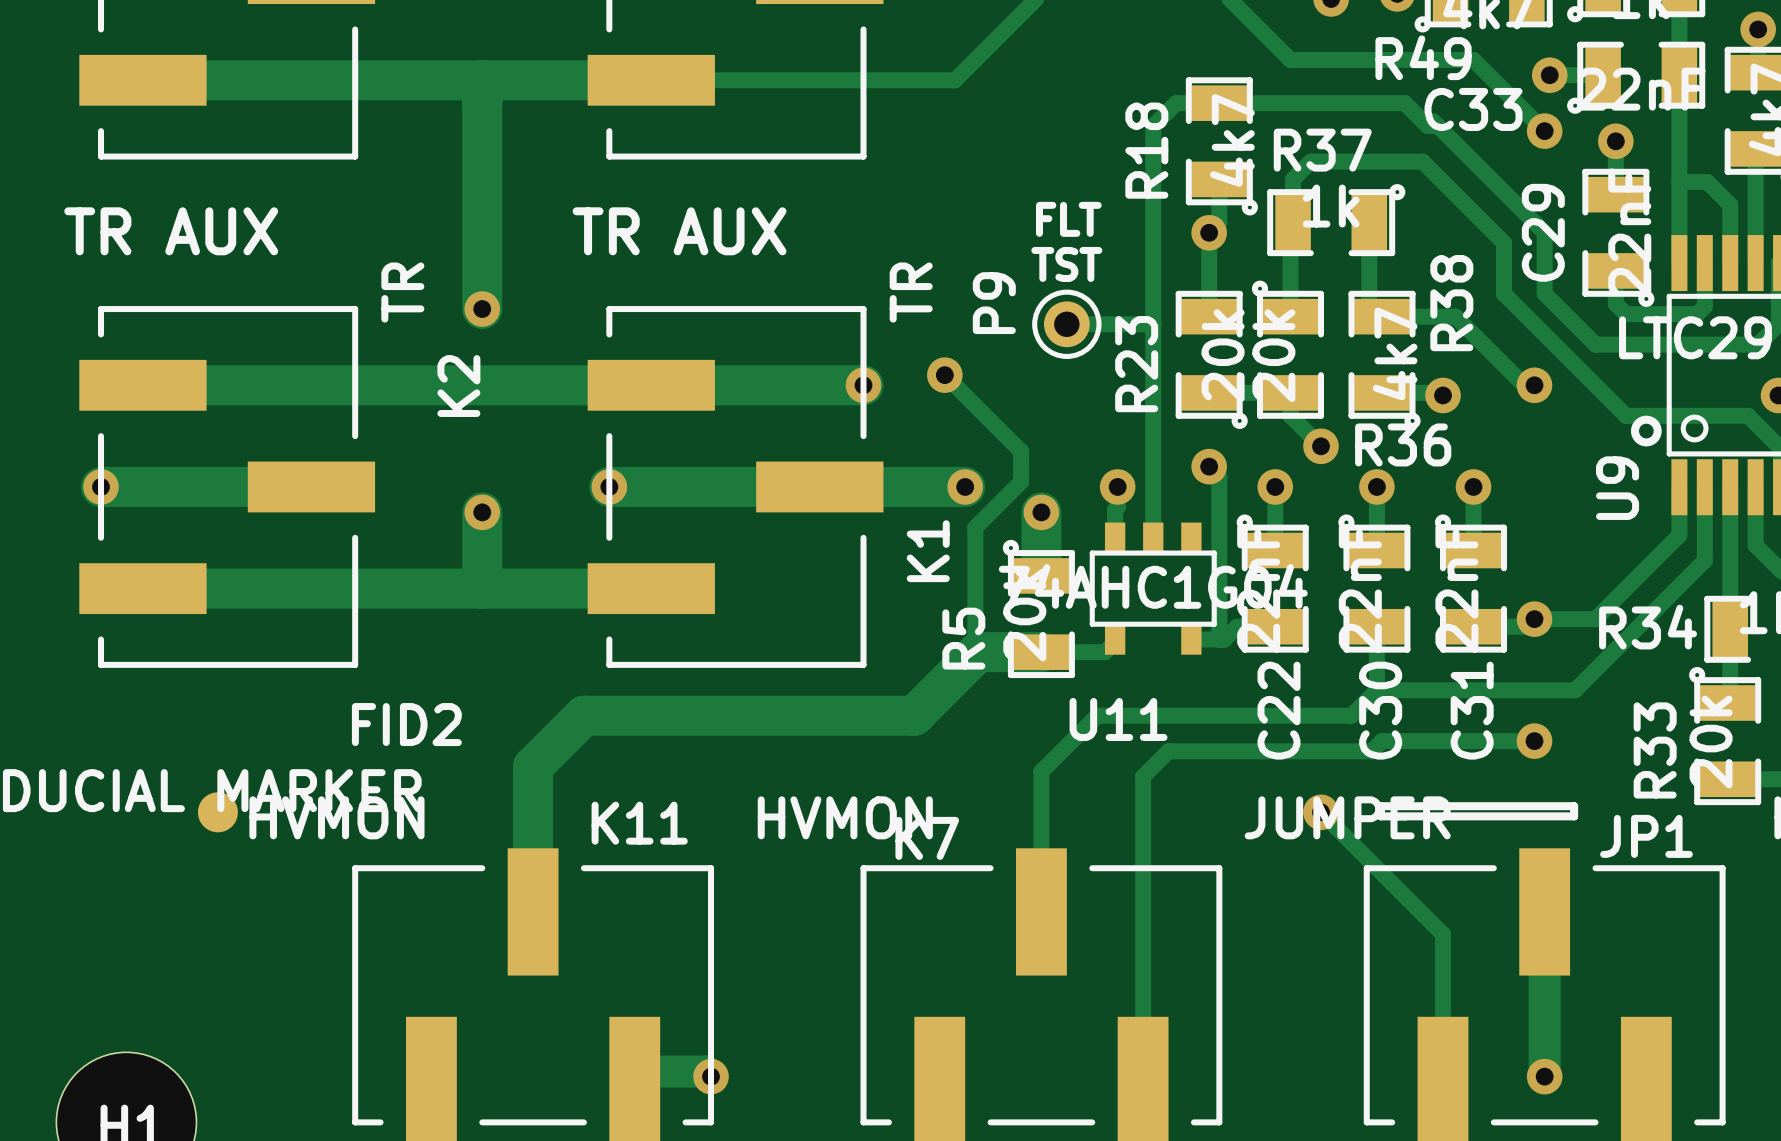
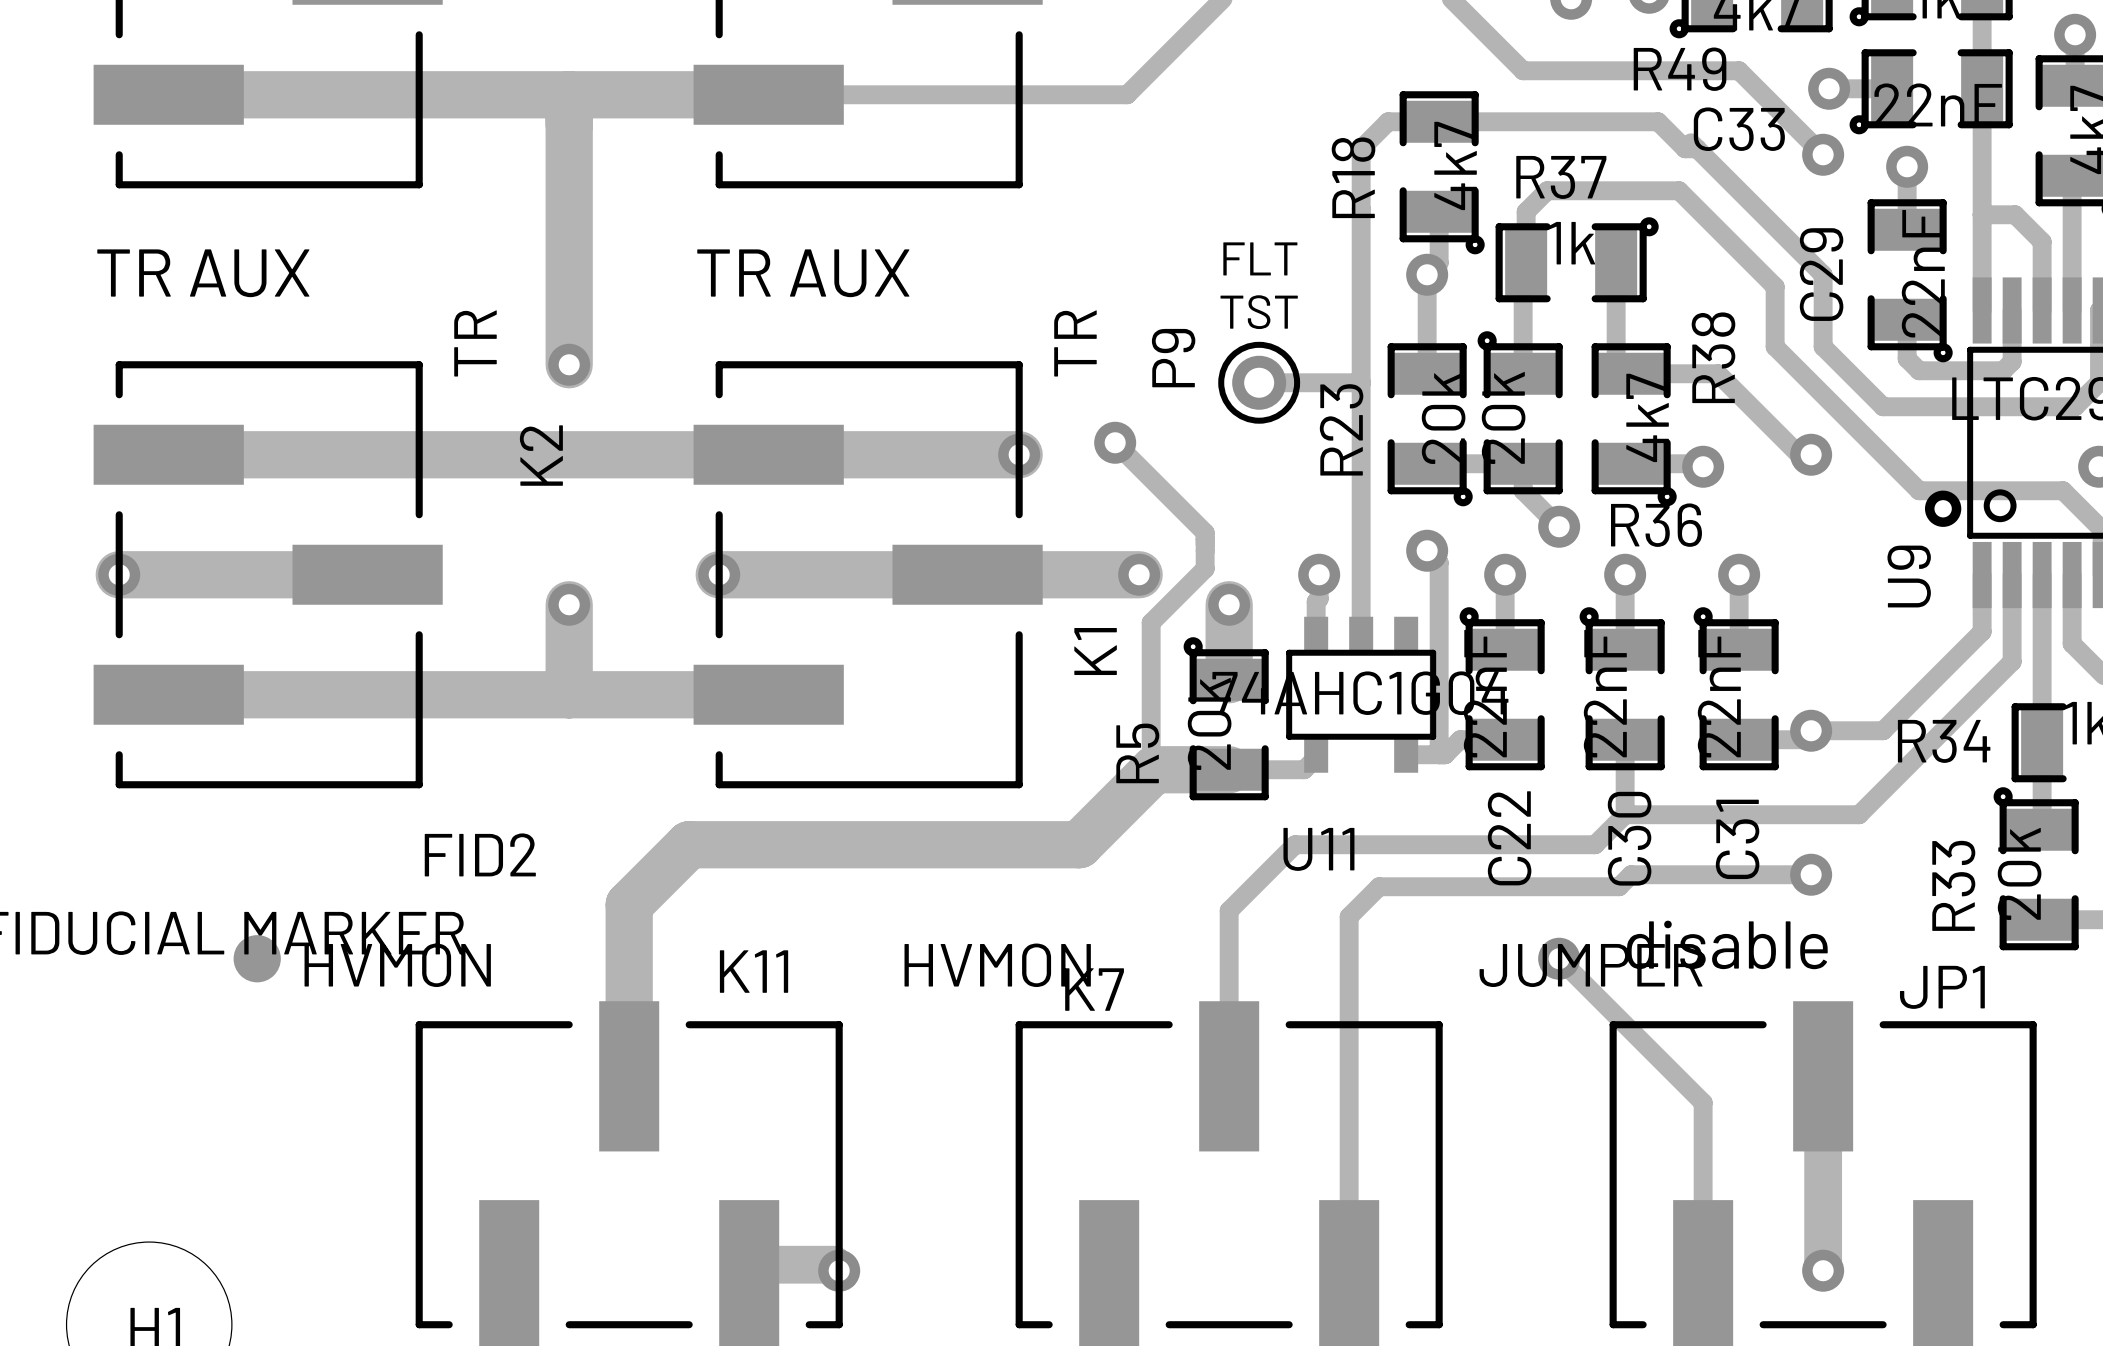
text: none -> disable (1727, 944)
line: (1380, 806) (1380, 816) (1574, 816) (1574, 806) (1380, 806) -> none

